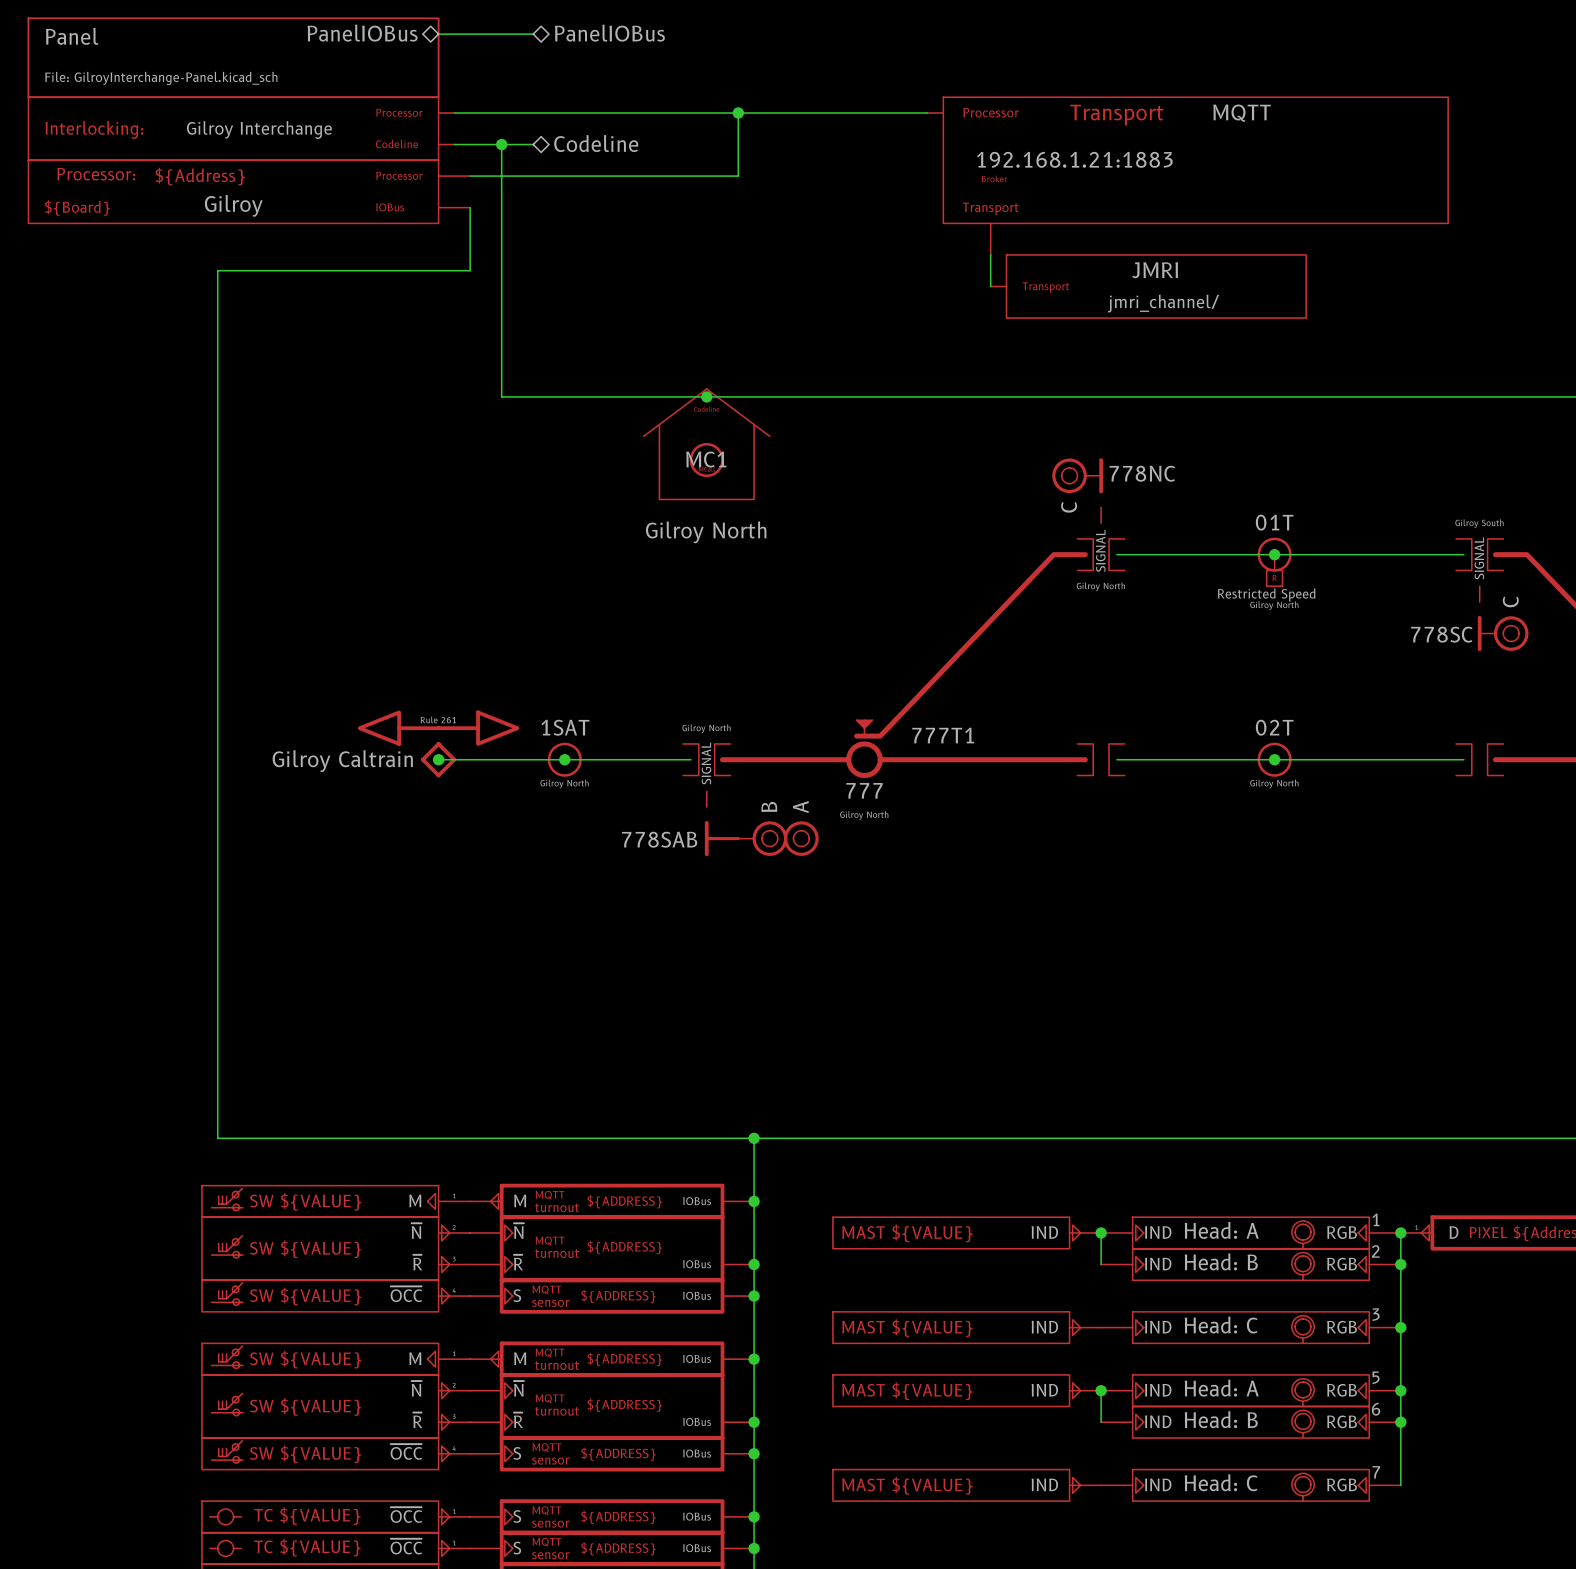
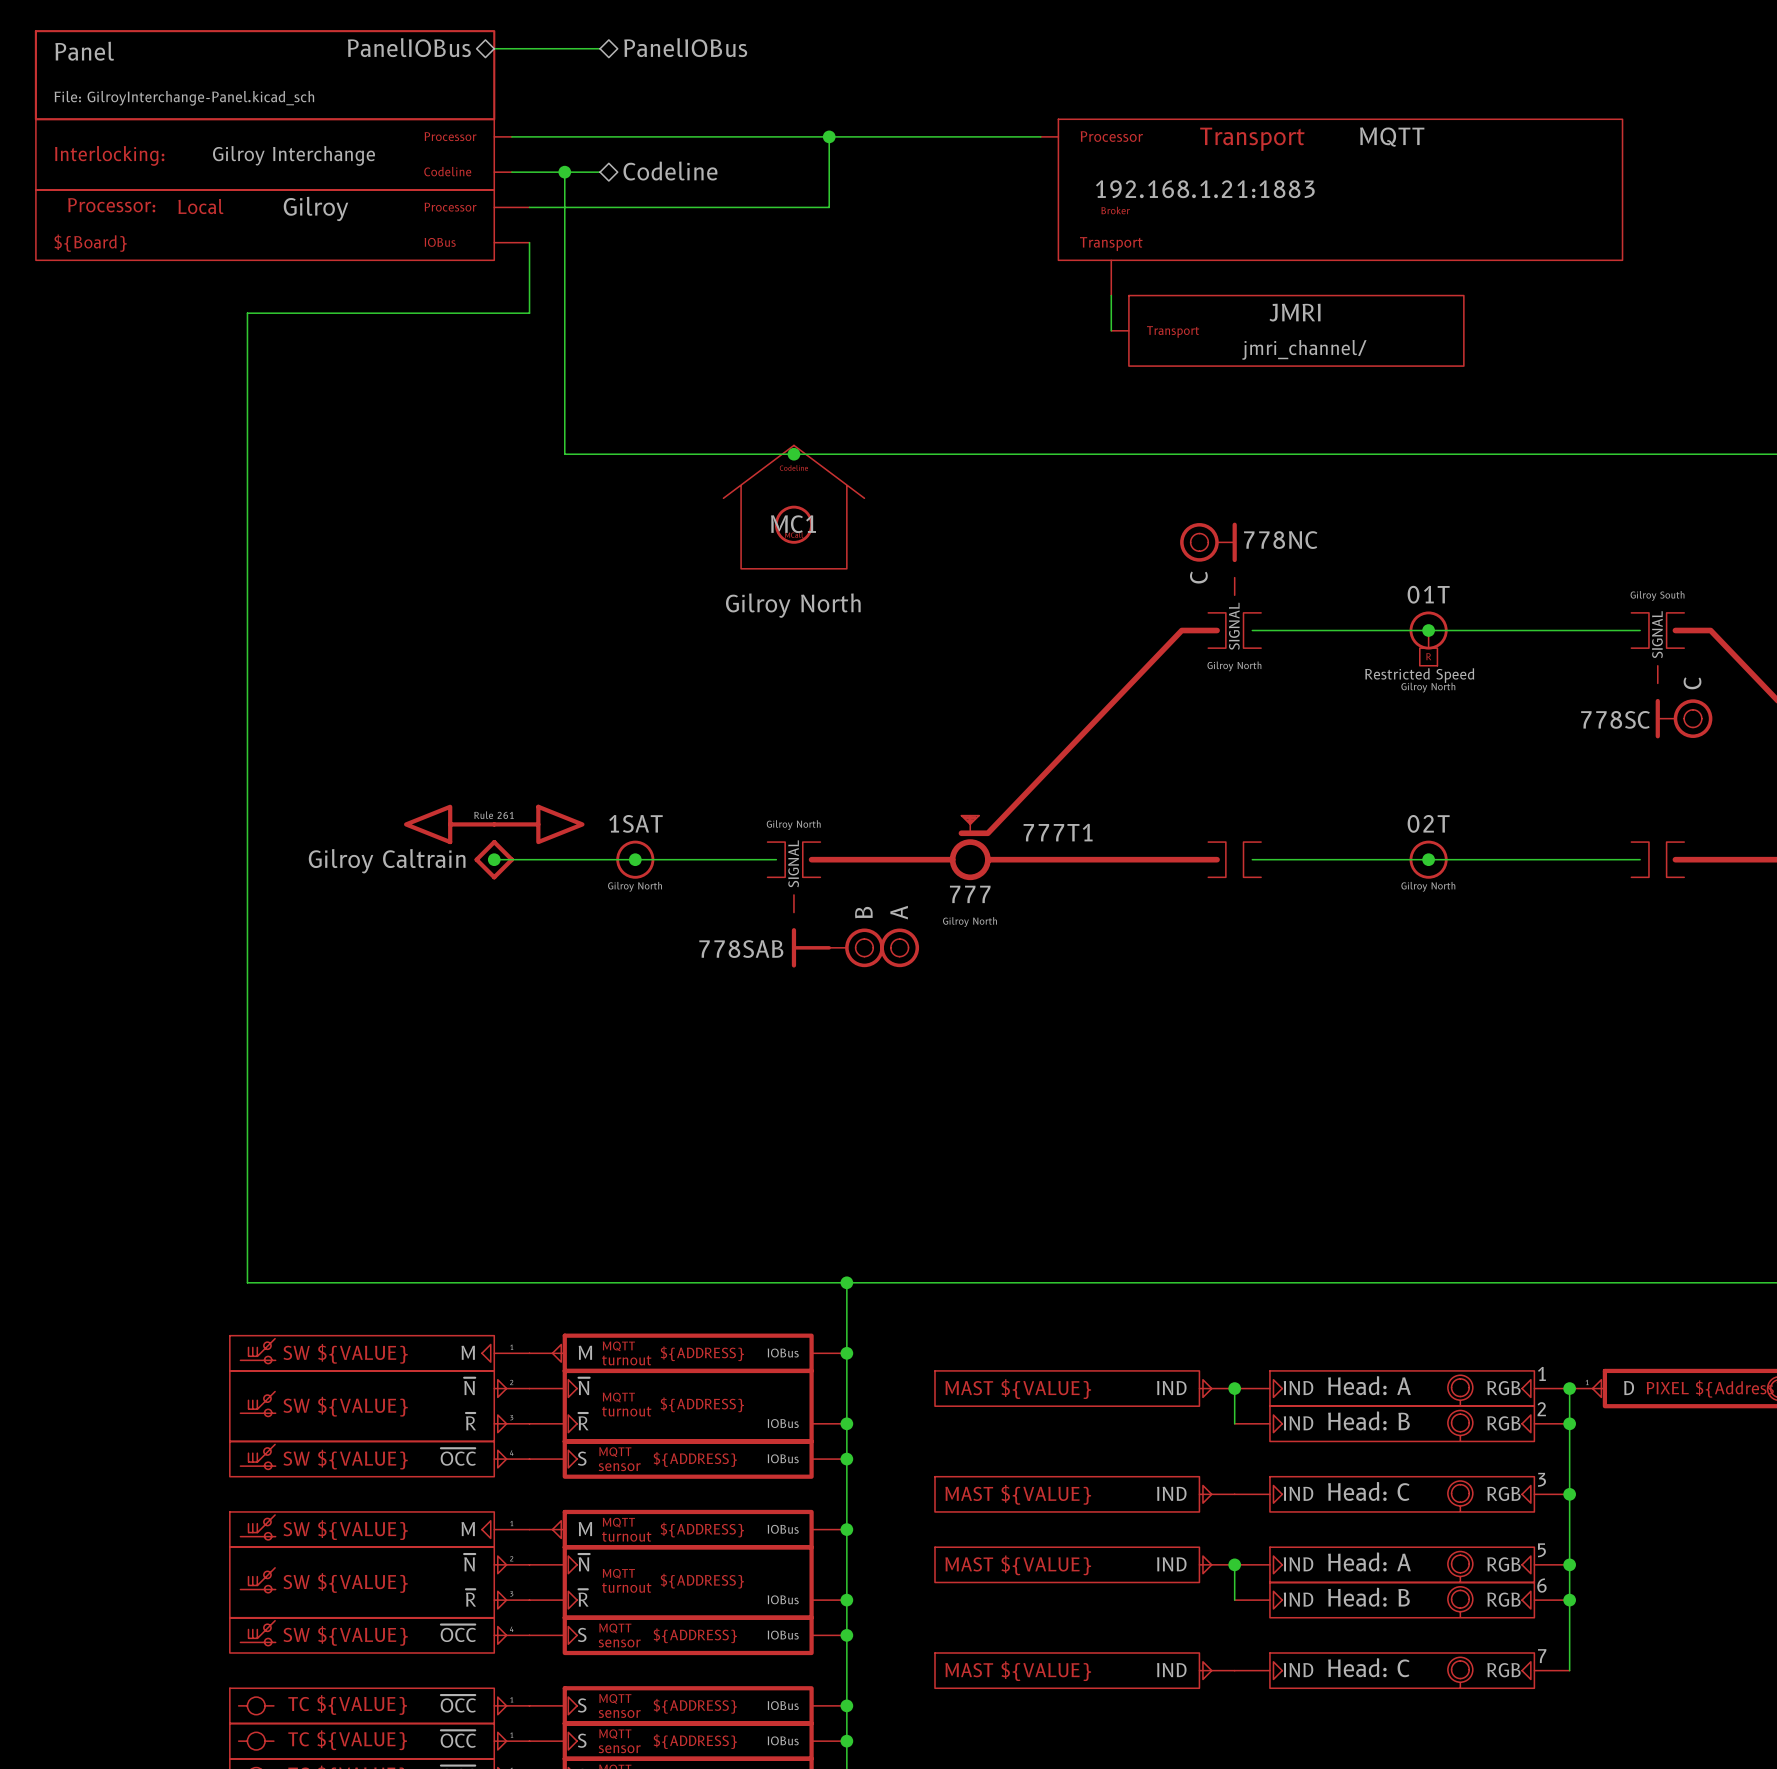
part text: ${Address} (200, 176) -> Local (200, 206)
part value position: Gilroy (233, 205) -> Gilroy (316, 208)

